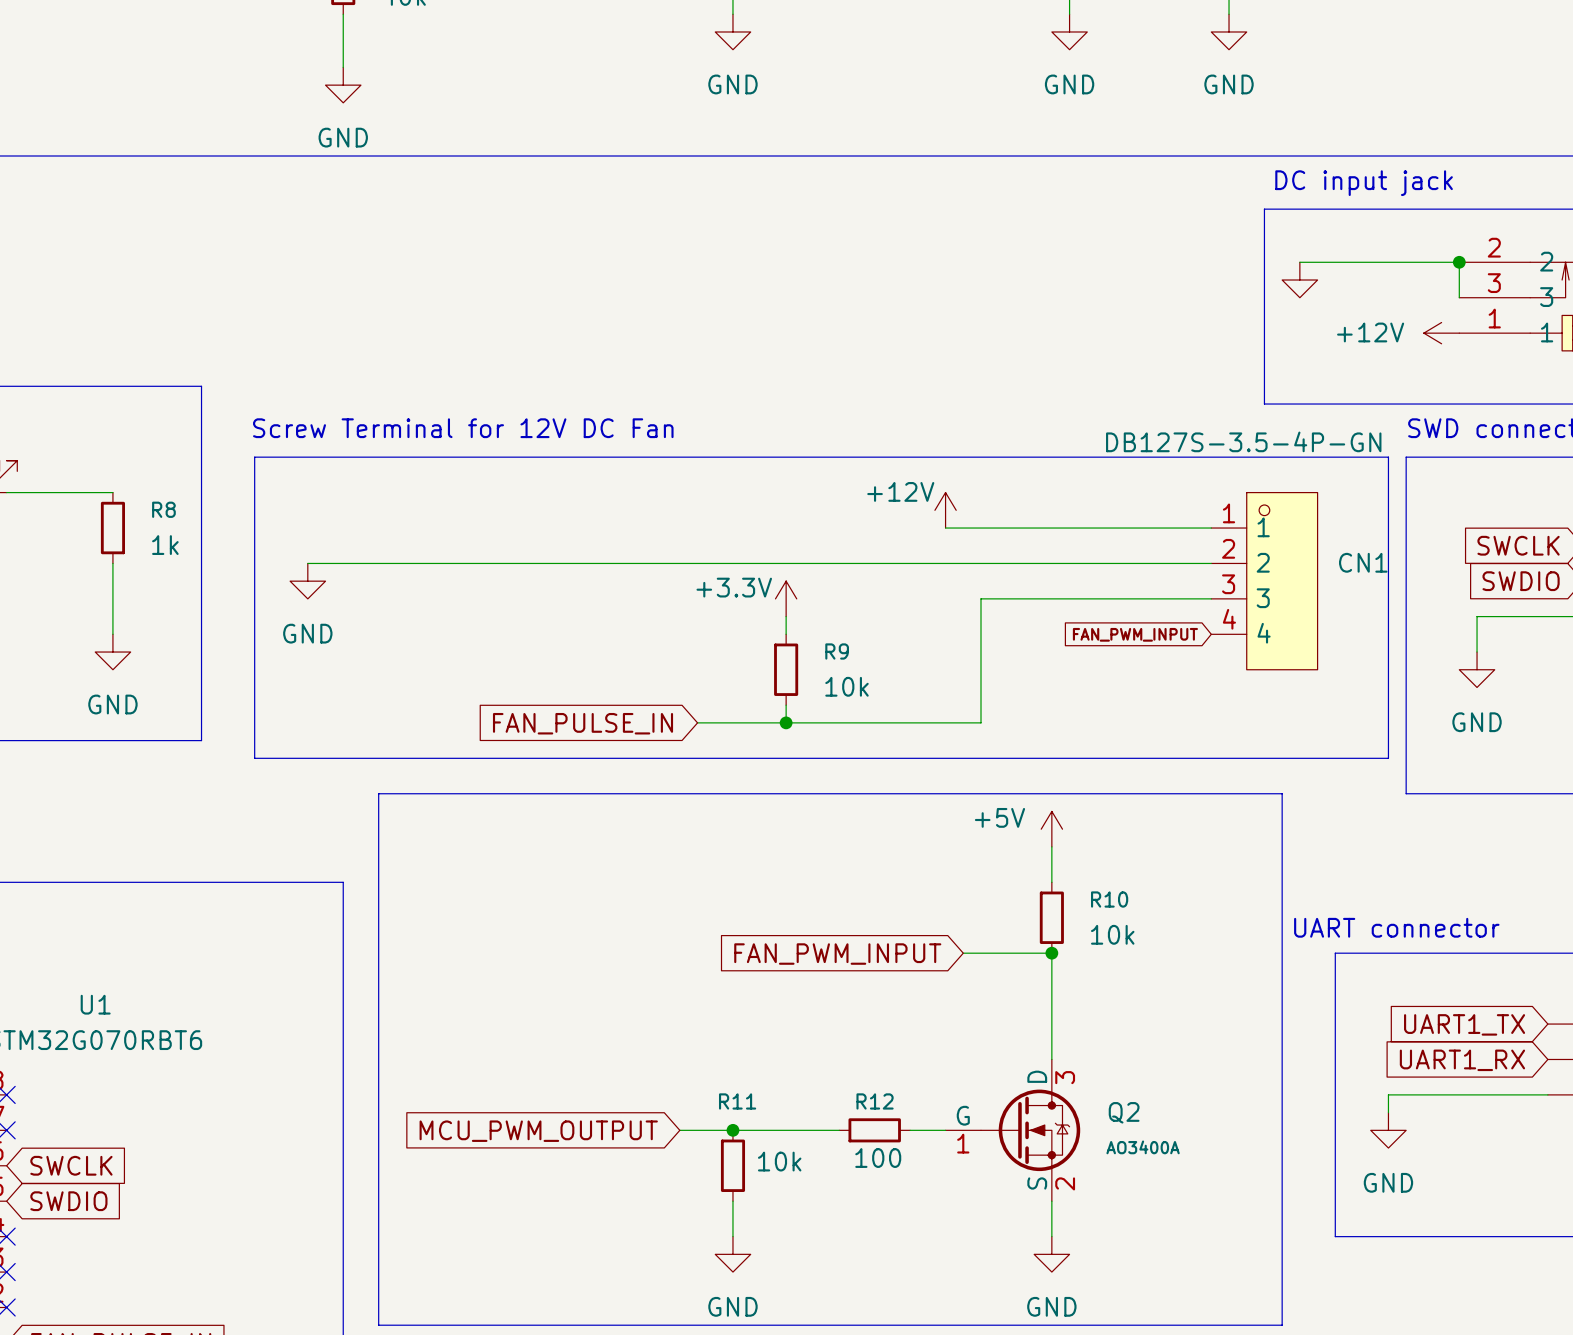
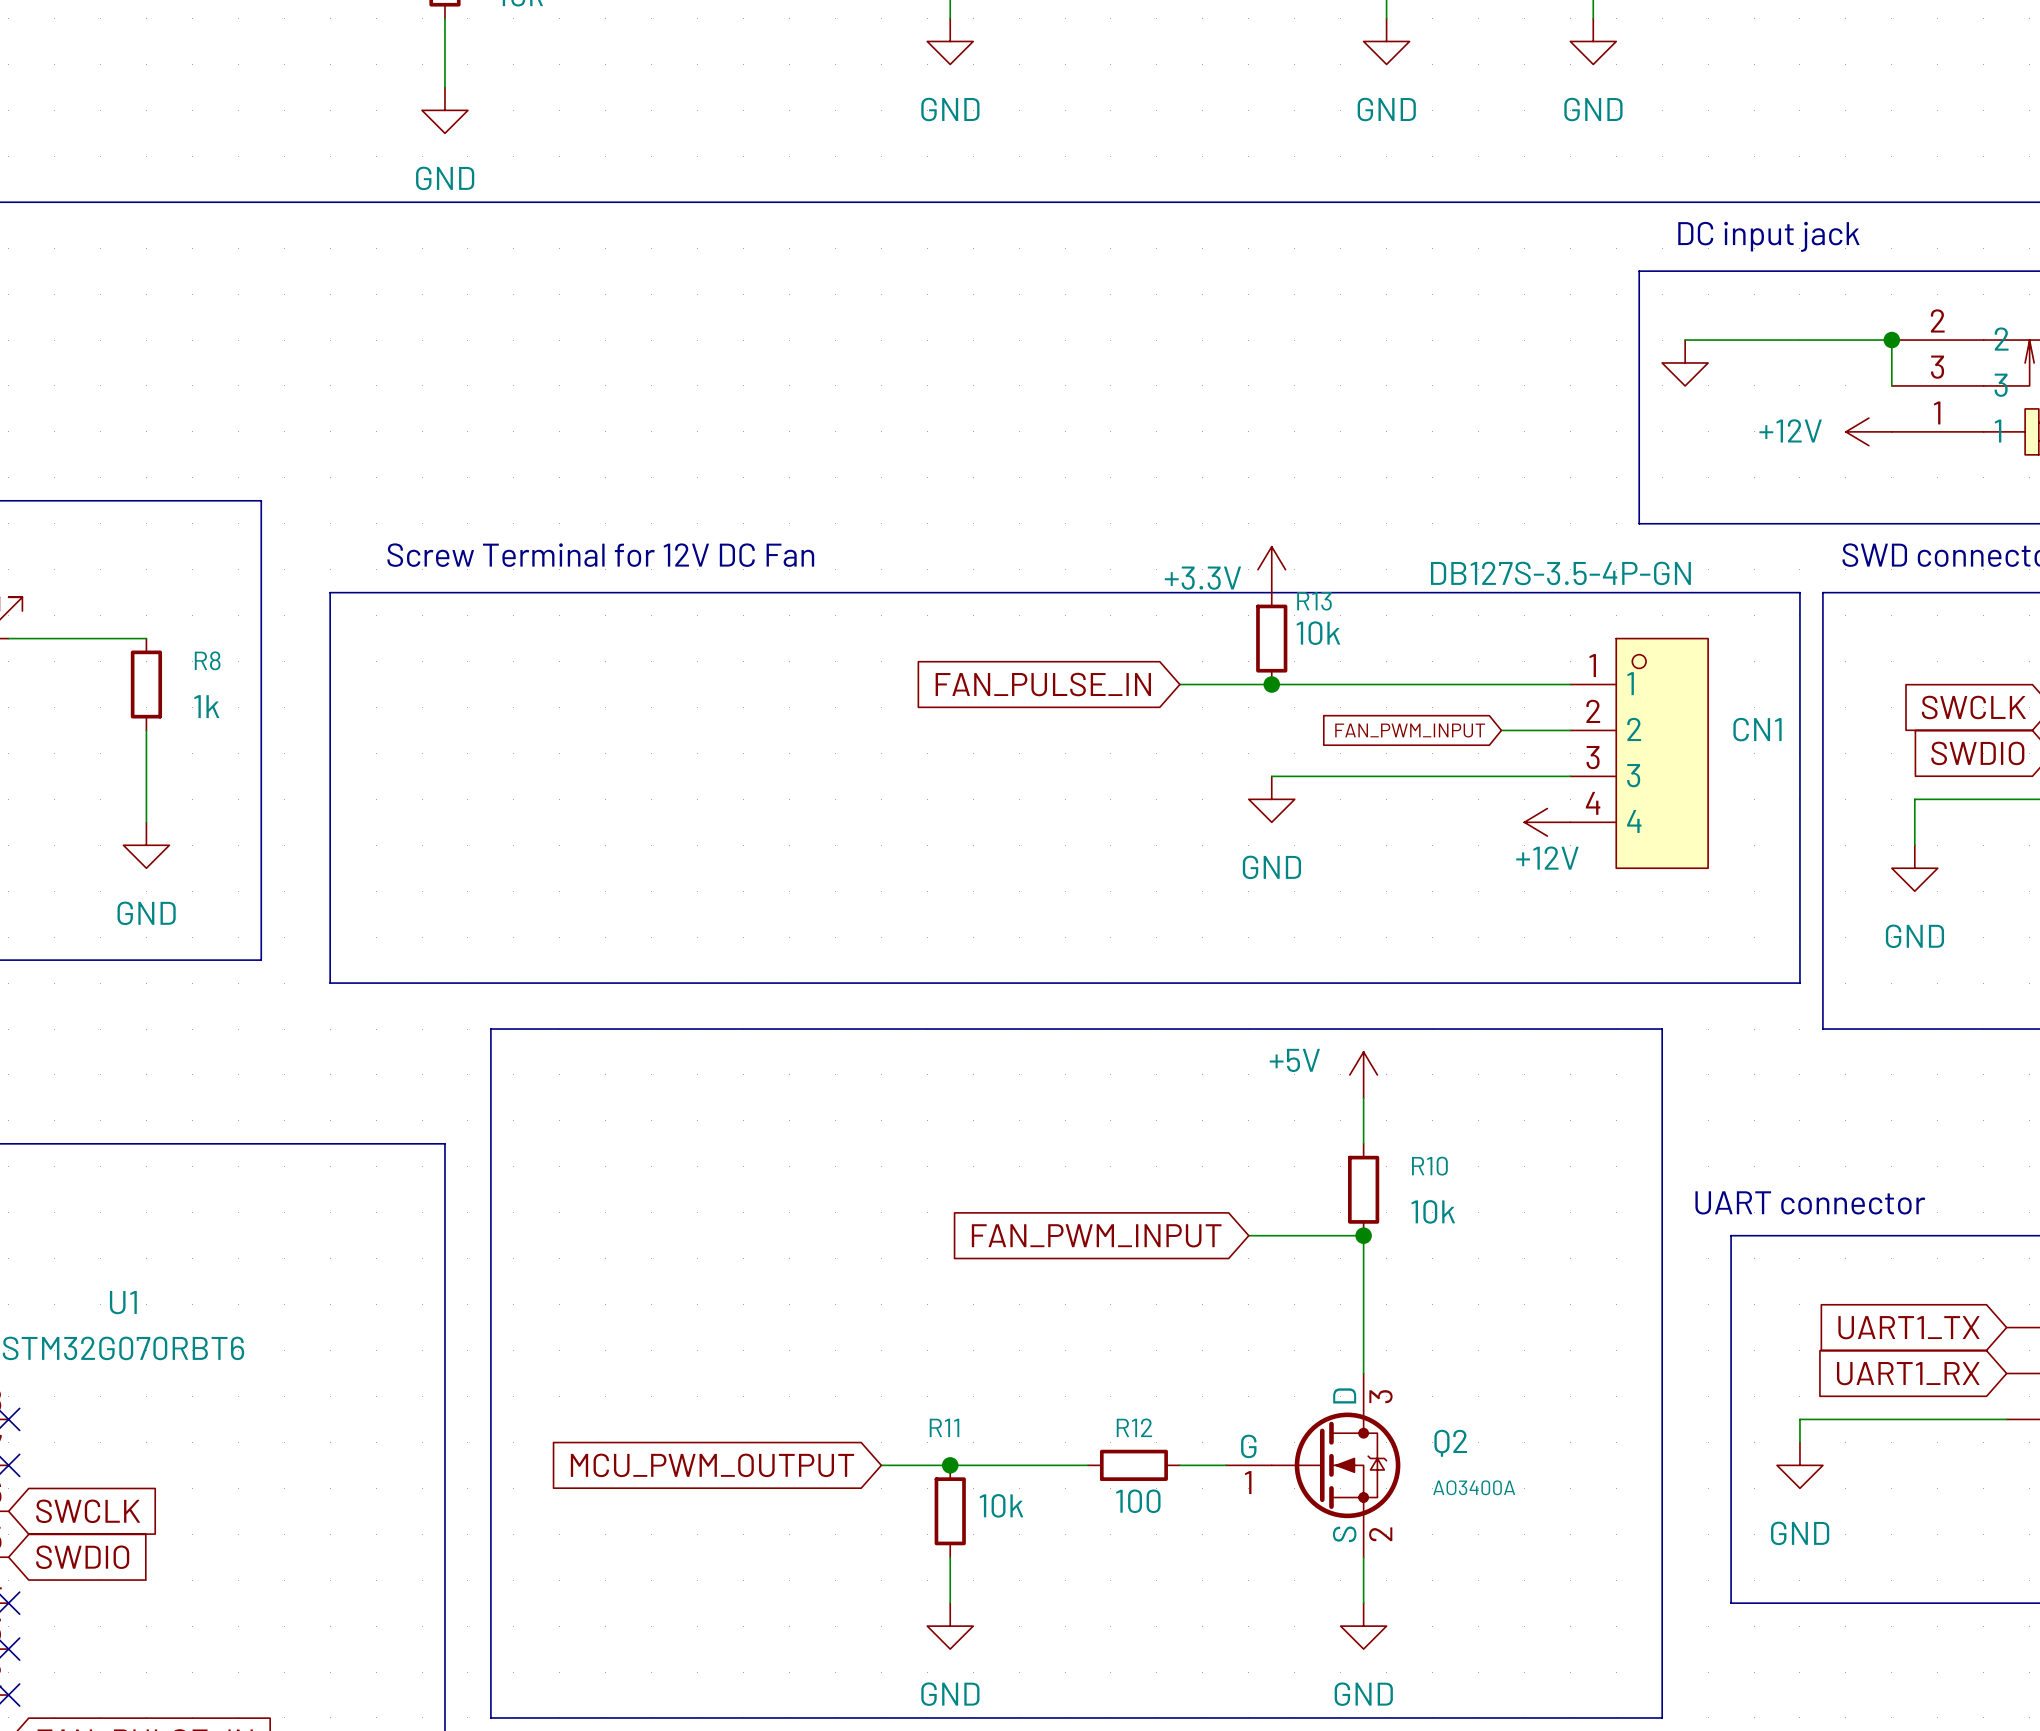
R13: none -> 10k (1271, 638)
power symbol rotation: 0° (945, 510) -> 90° counterclockwise (1547, 822)
power symbol position: +12V (945, 510) -> +12V (1547, 822)
wire: none -> (1179, 684) (1225, 684)
junction: none -> (1271, 684)
wire: (307, 563) (1158, 563) -> none
power symbol: GND (307, 581) -> none
power symbol text position: +3.3V (734, 587) -> +3.3V (1202, 578)
power symbol position: +3.3V (786, 598) -> +3.3V (1271, 569)
wire: (981, 598) (981, 722) (697, 722) -> none
wire: (786, 616) (786, 634) -> none
power symbol: none -> GND (1271, 799)
global label position: FAN_PWM_INPUT (1135, 634) -> FAN_PWM_INPUT (1410, 730)
R9: 10k (786, 669) -> none
wire: (786, 705) (786, 722) -> none
junction: (786, 722) -> none
global label position: FAN_PULSE_IN (583, 723) -> FAN_PULSE_IN (1043, 684)

